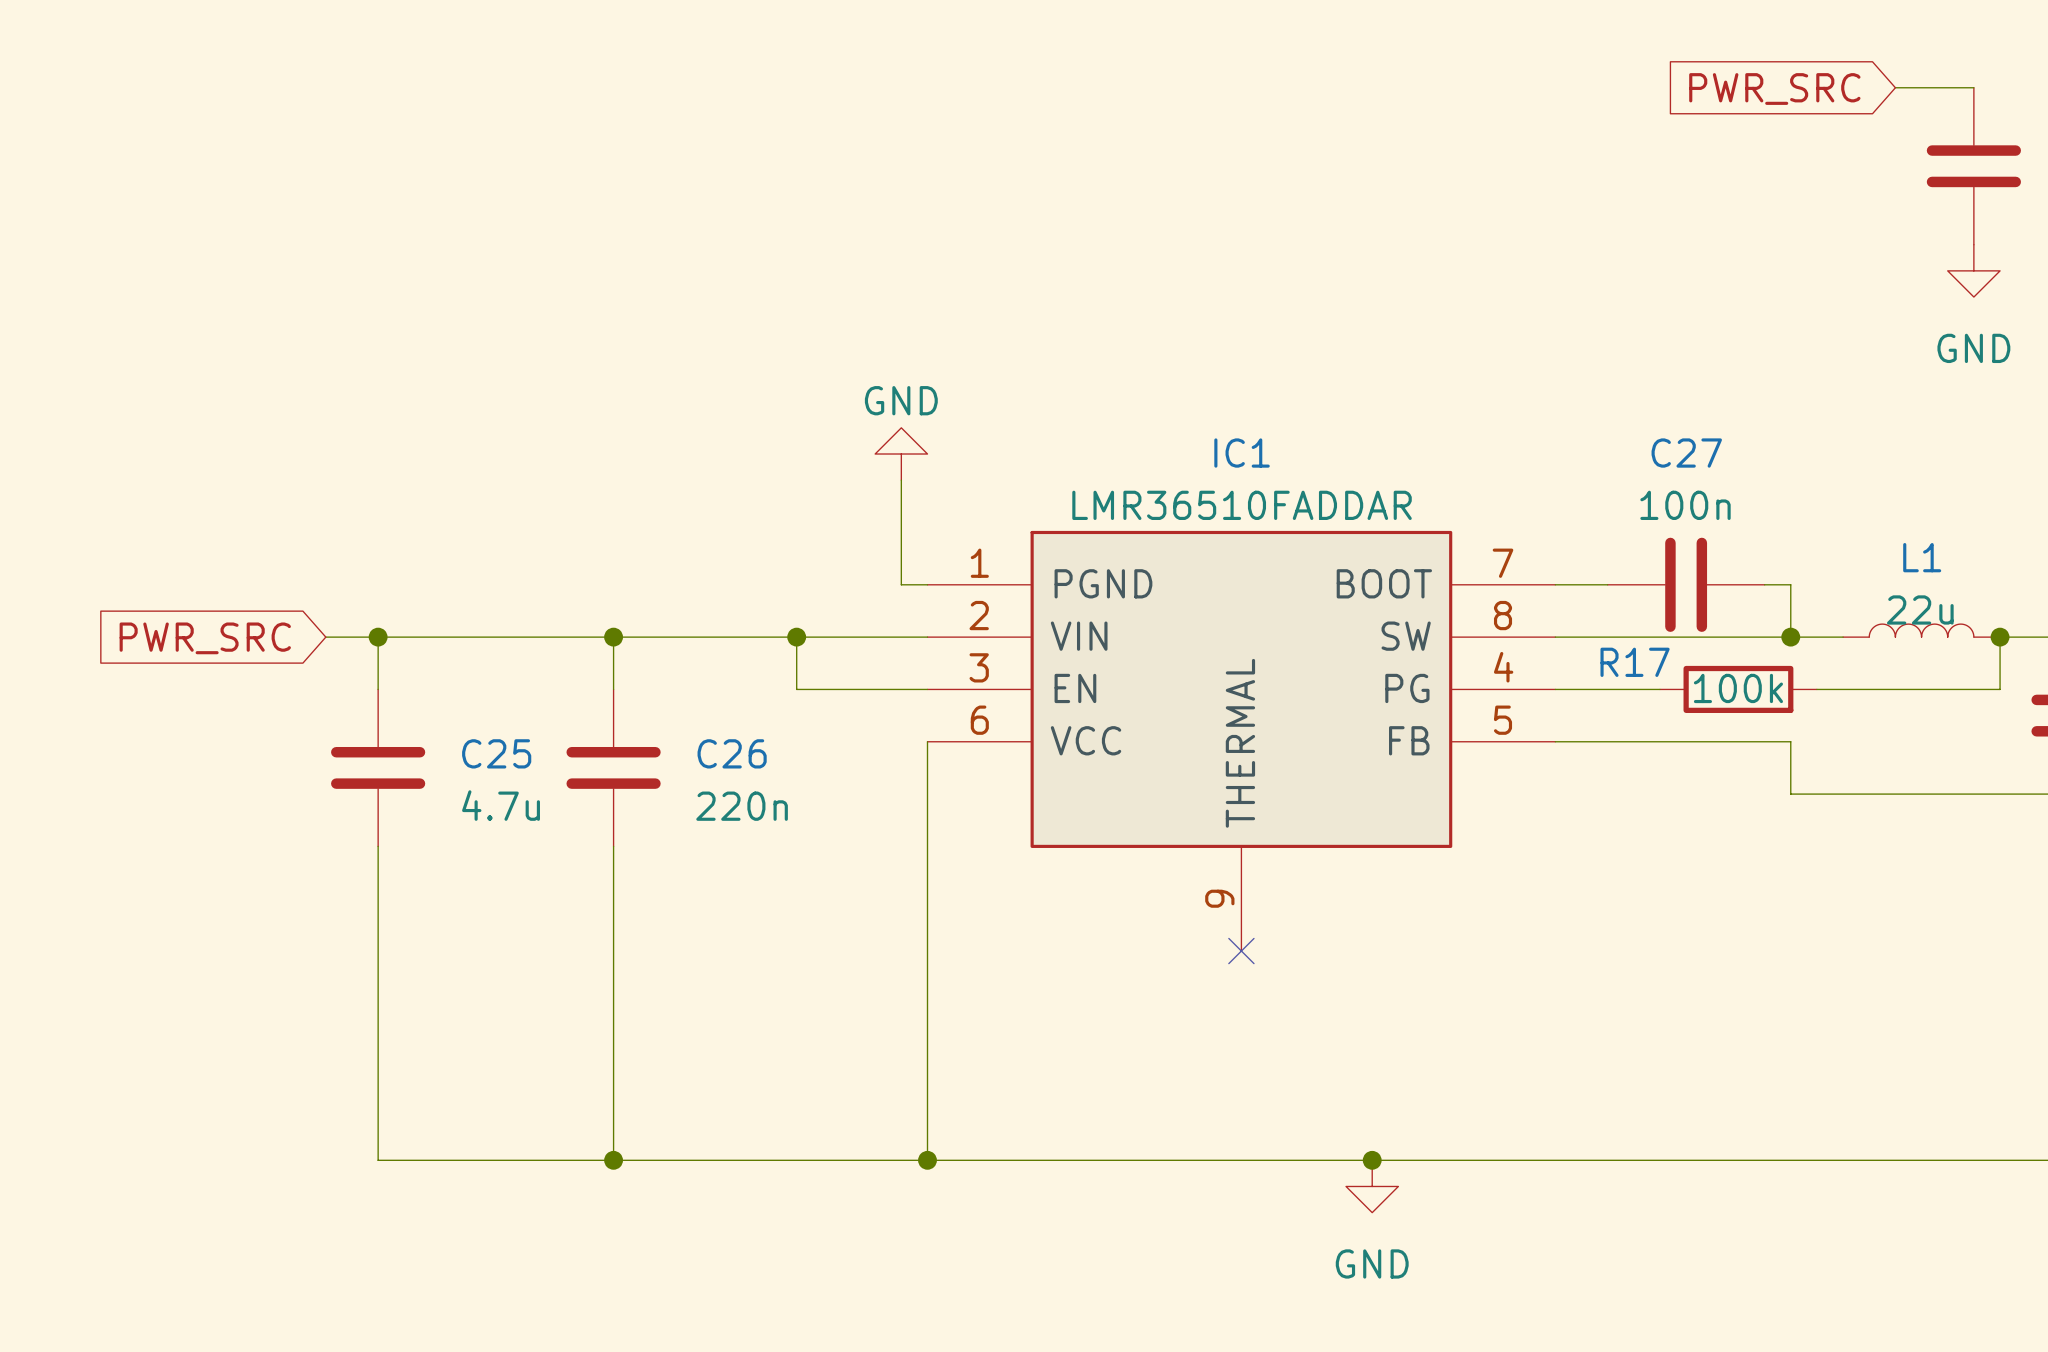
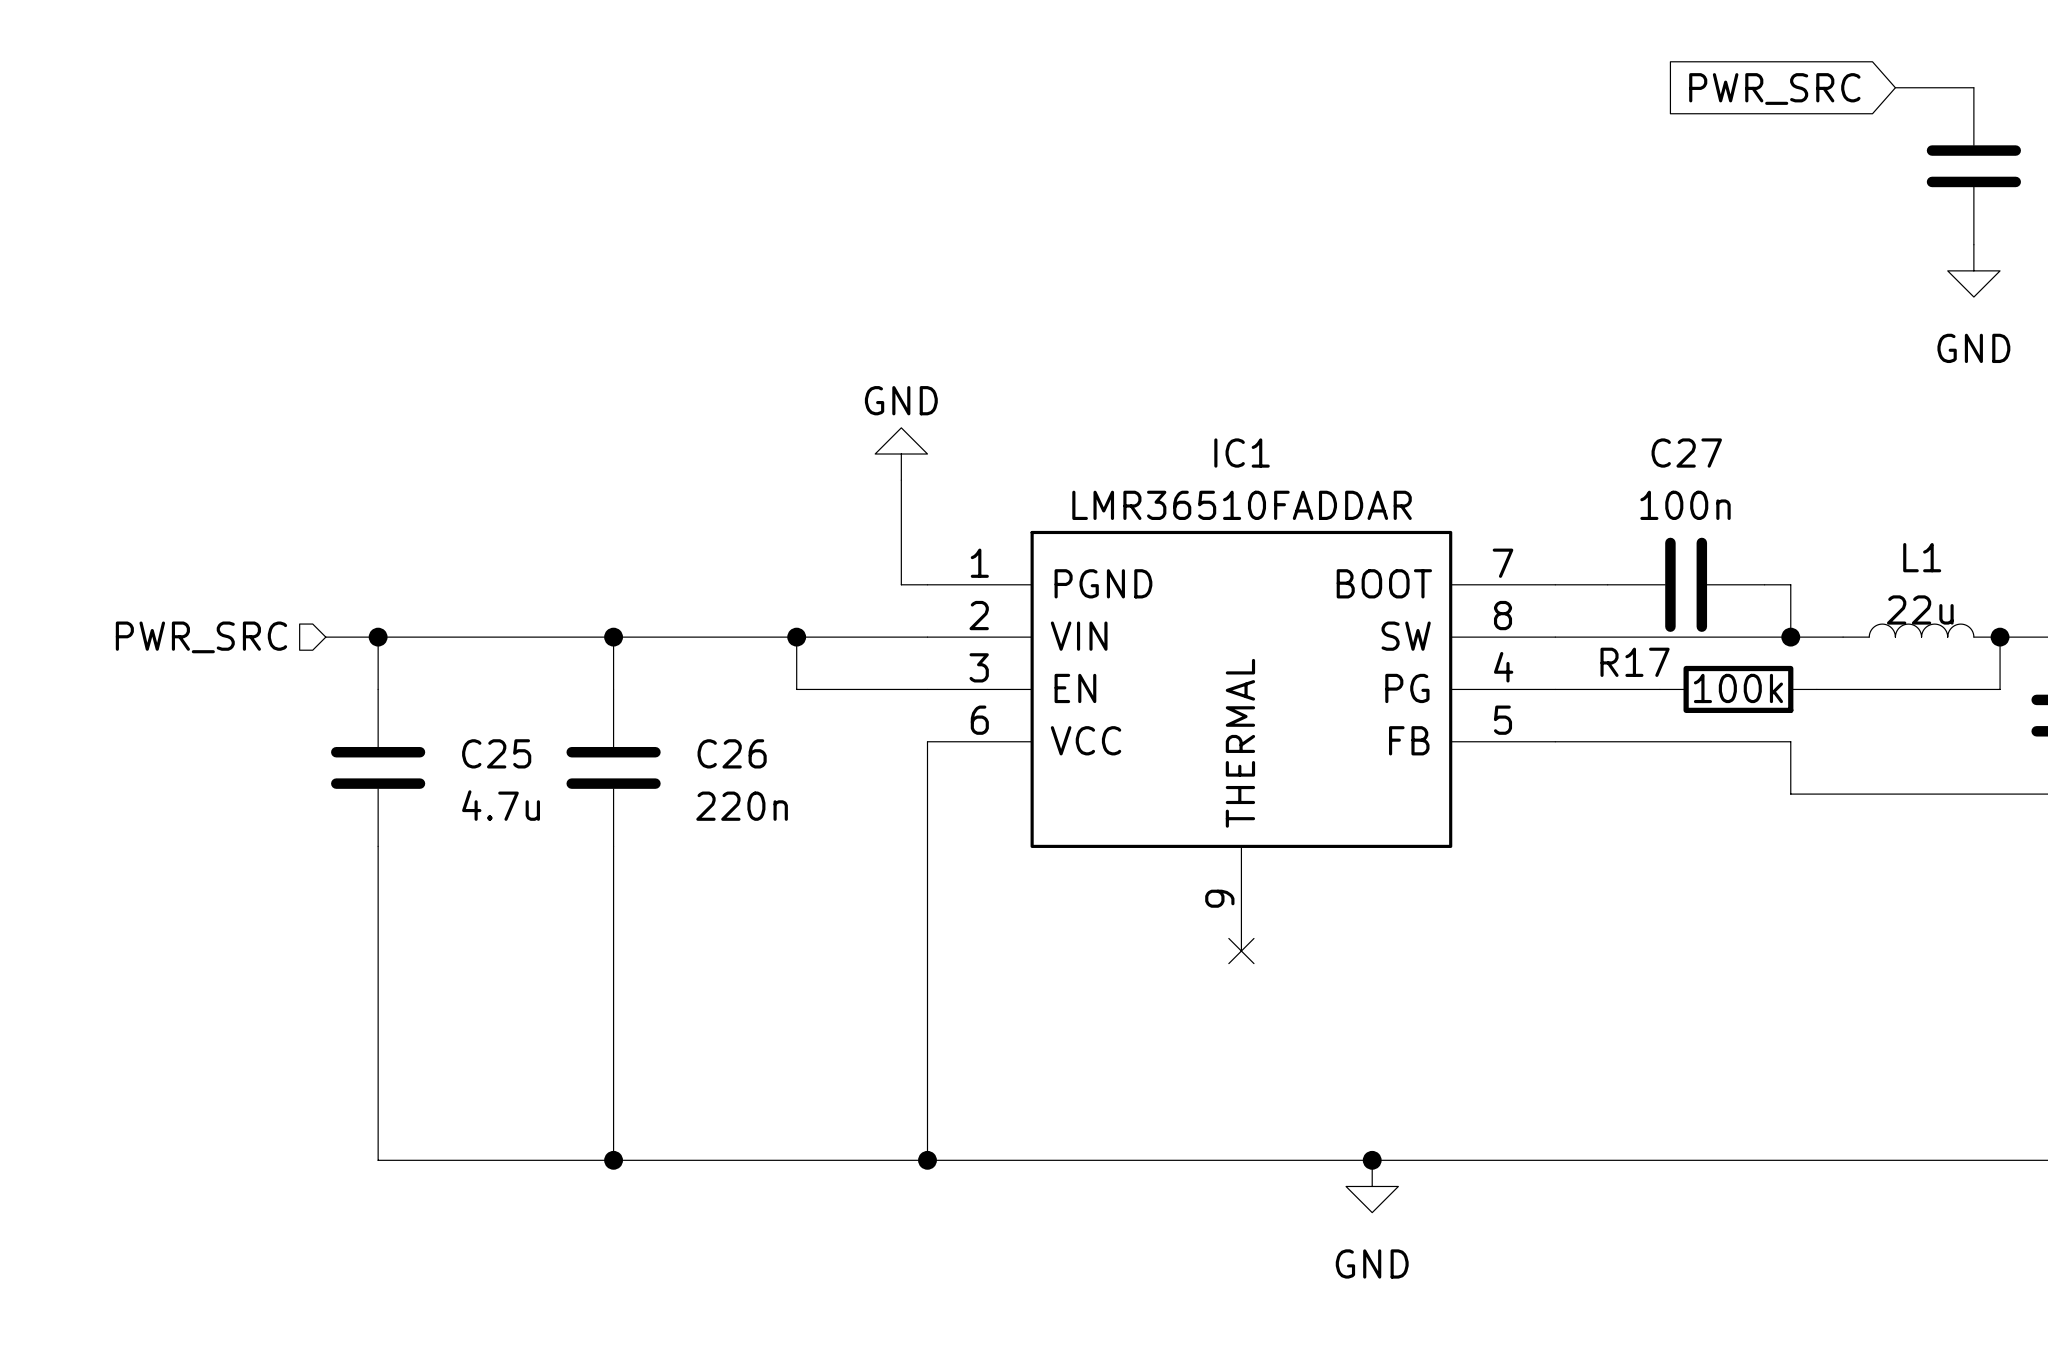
hierarchical label: none -> PWR_SRC (201, 637)
global label: PWR_SRC (205, 638) -> none

